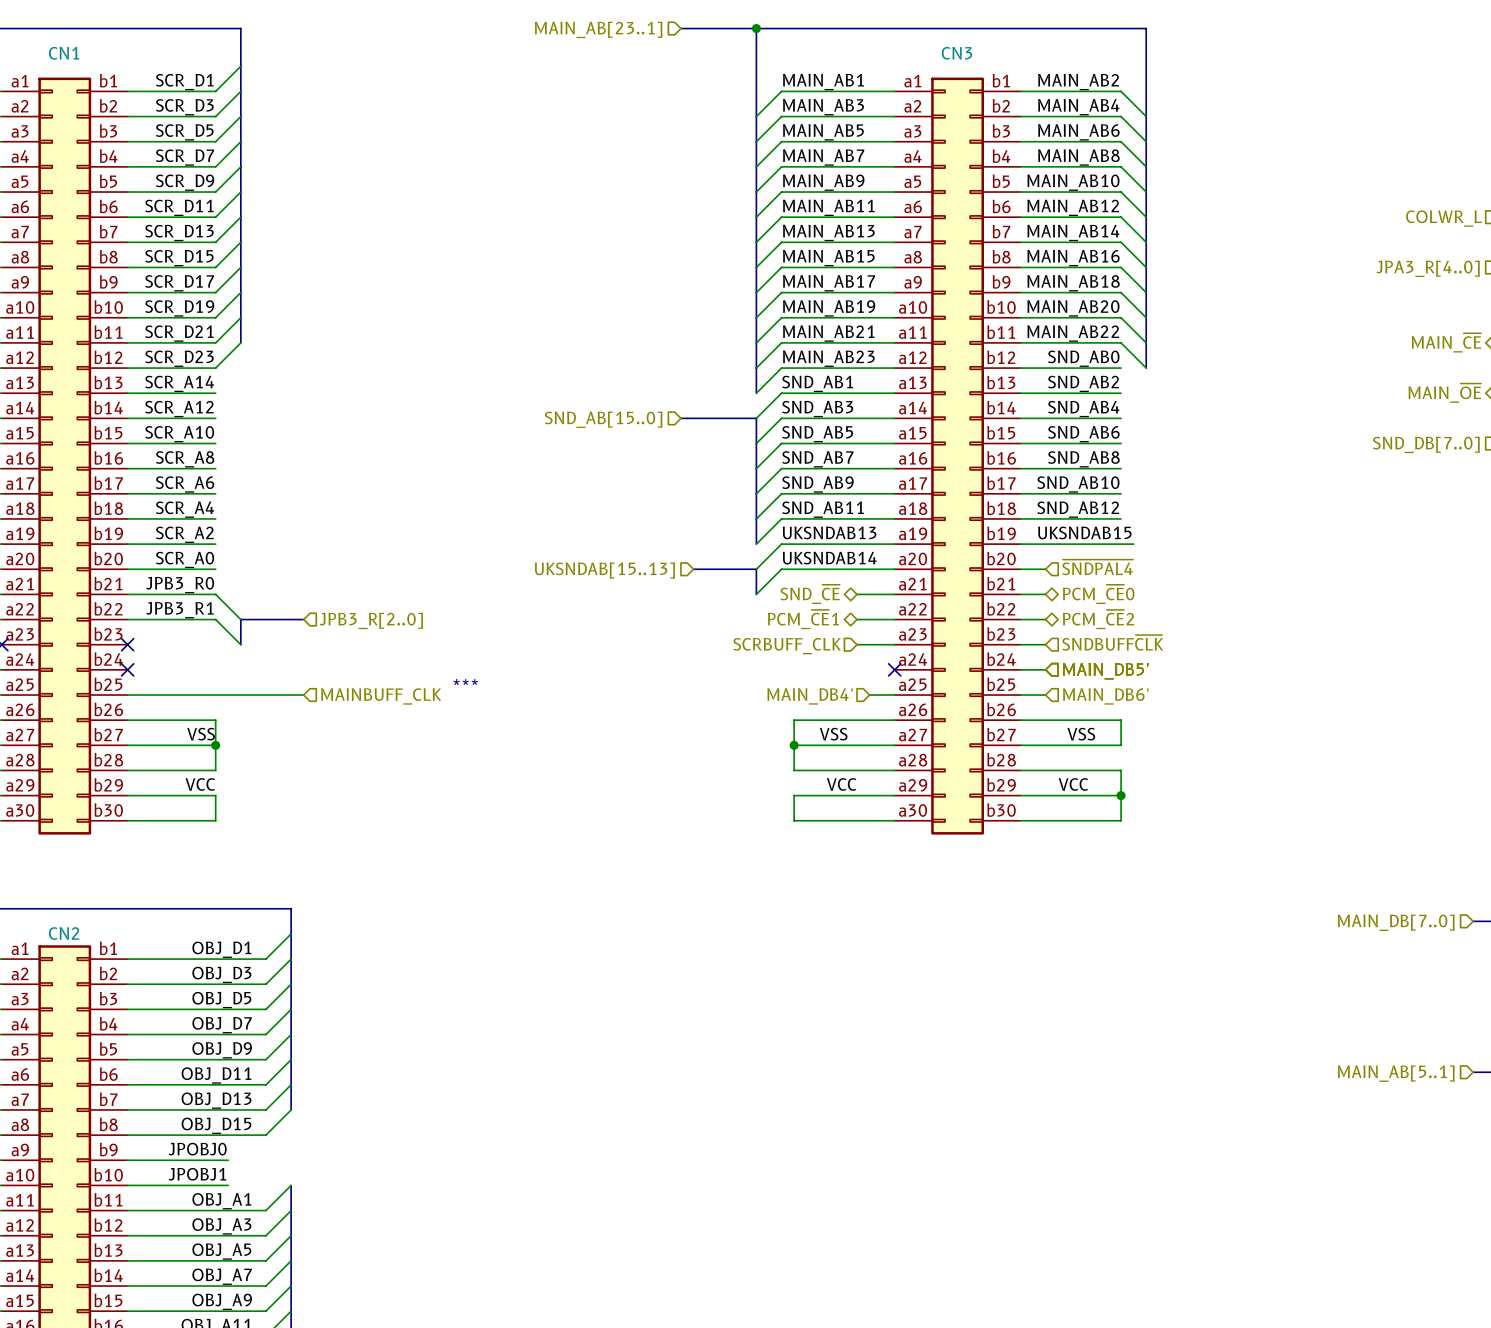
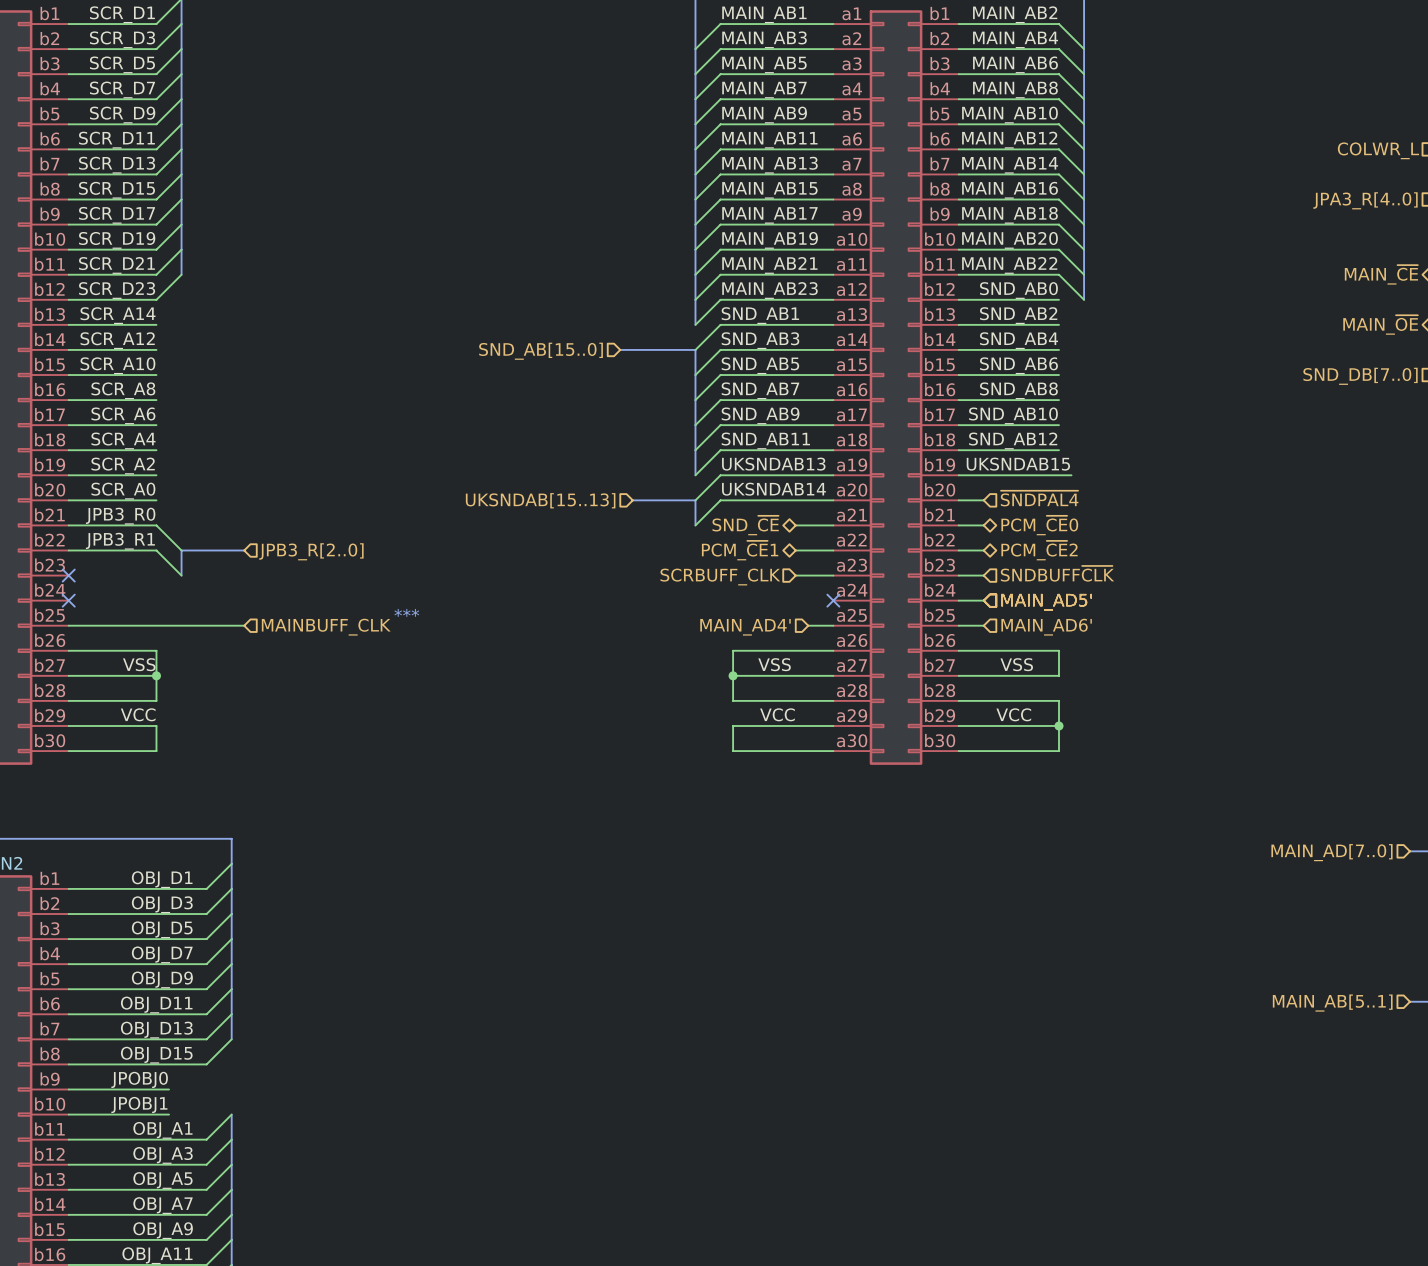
hierarchical label: MAIN_DB5' (1105, 671) -> MAIN_AD5' (1046, 602)
hierarchical label: MAIN_DB4' (810, 696) -> MAIN_AD4' (745, 627)
hierarchical label: MAIN_DB6' (1105, 696) -> MAIN_AD6' (1046, 627)
hierarchical label: MAIN_DB[7..0] (1396, 922) -> MAIN_AD[7..0] (1331, 852)

